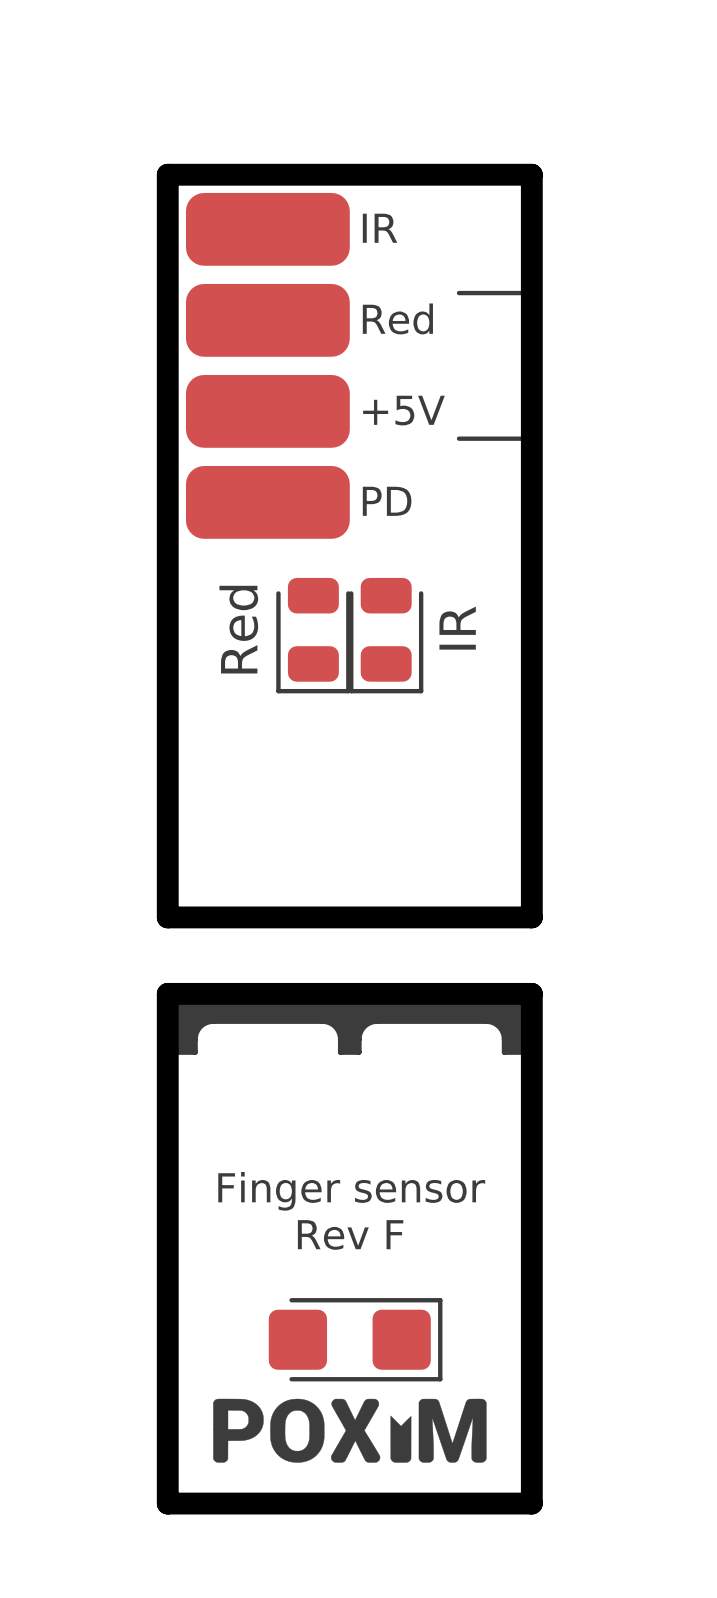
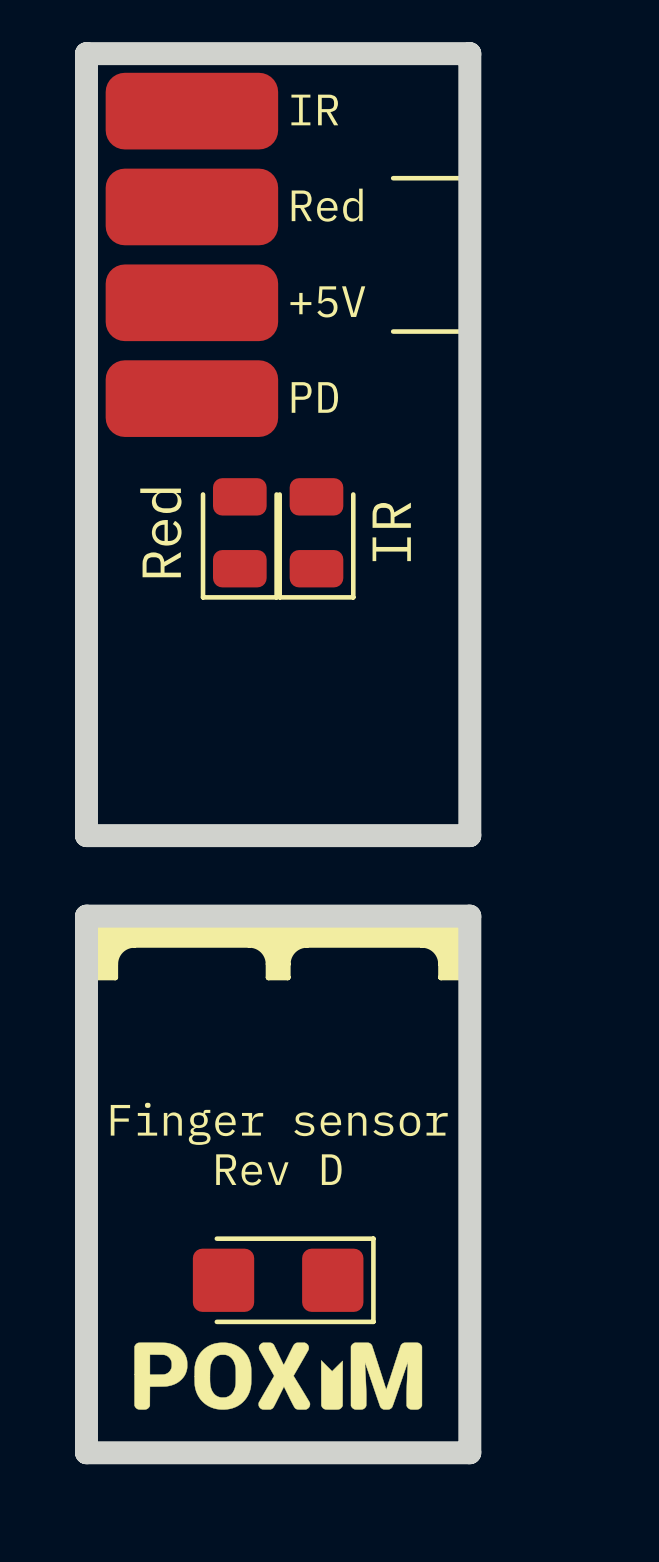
text: Rev F (350, 1234) -> Rev D (278, 1169)

